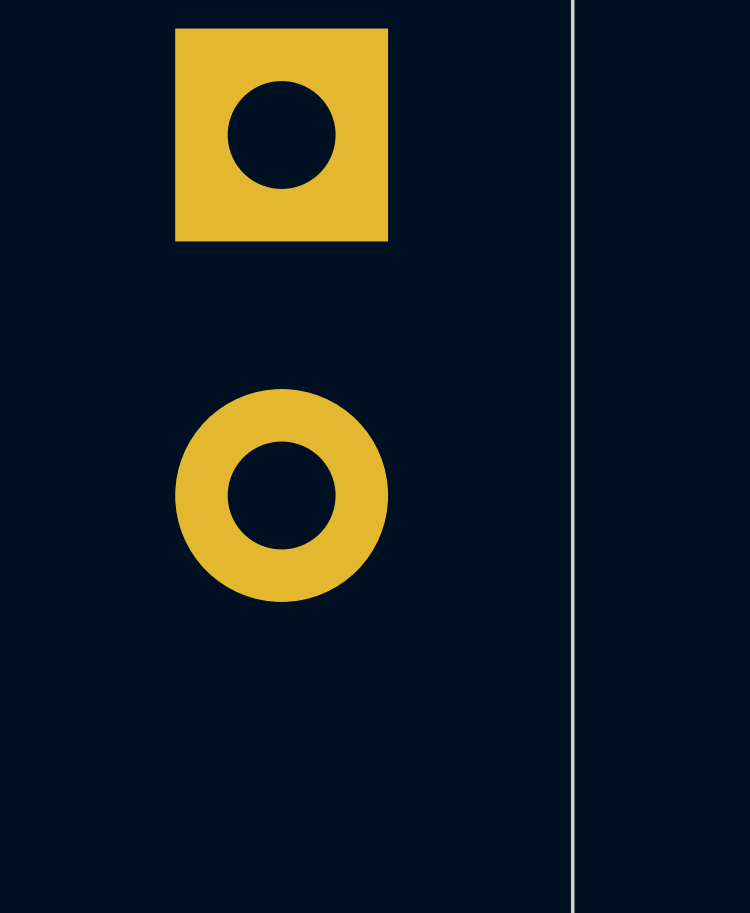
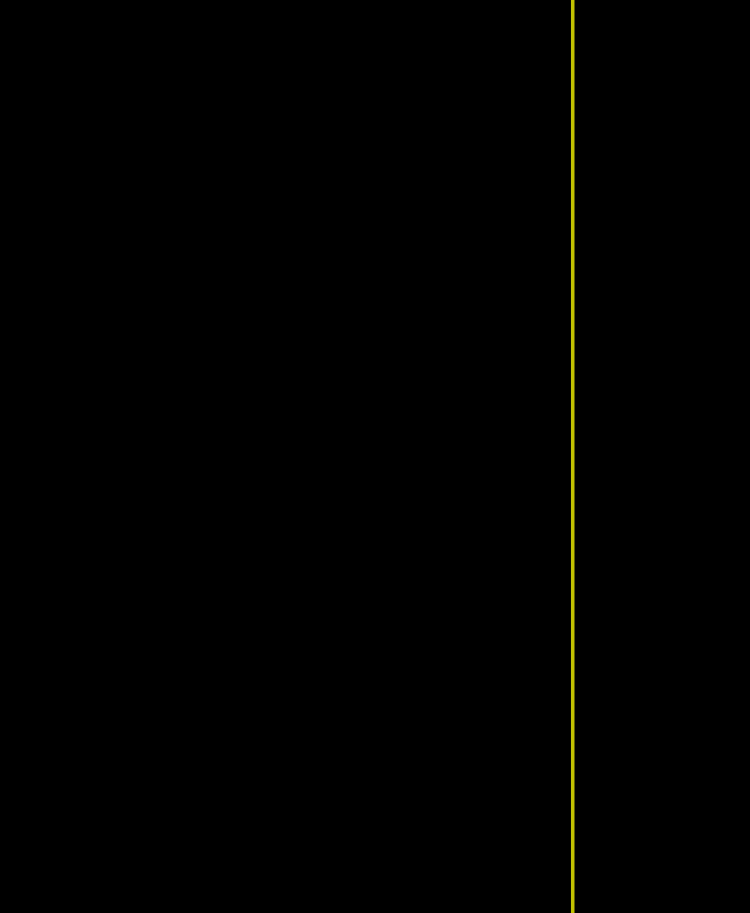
part: (281, 315) -> none

